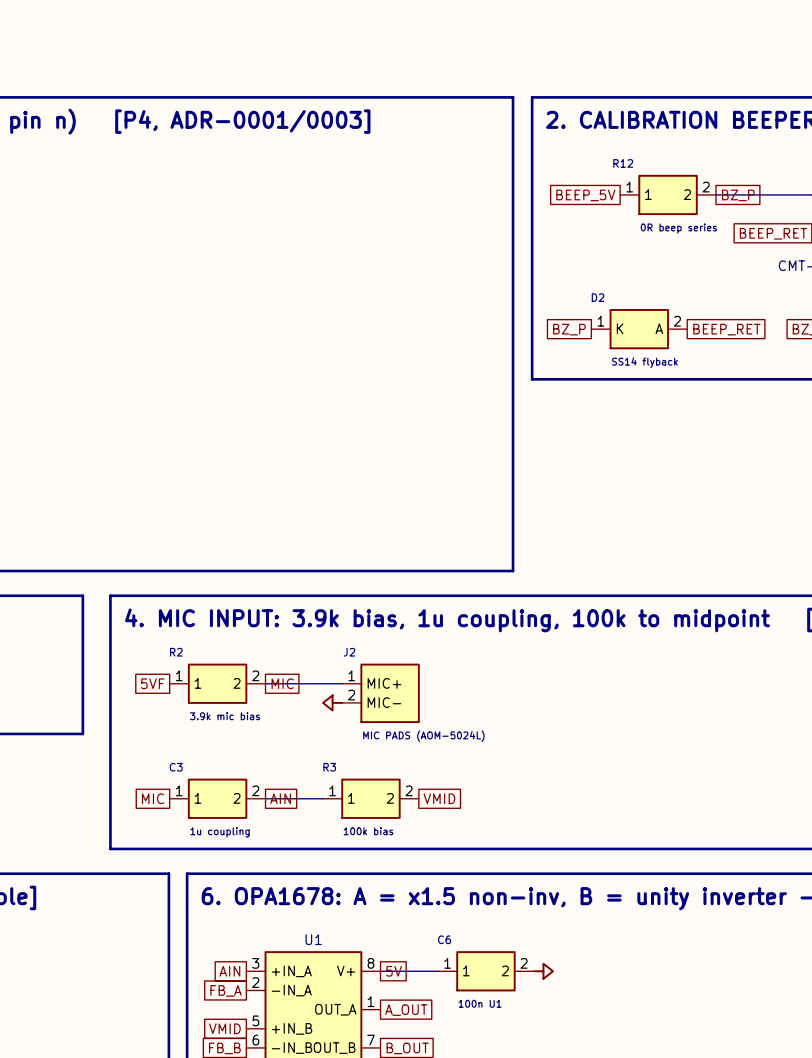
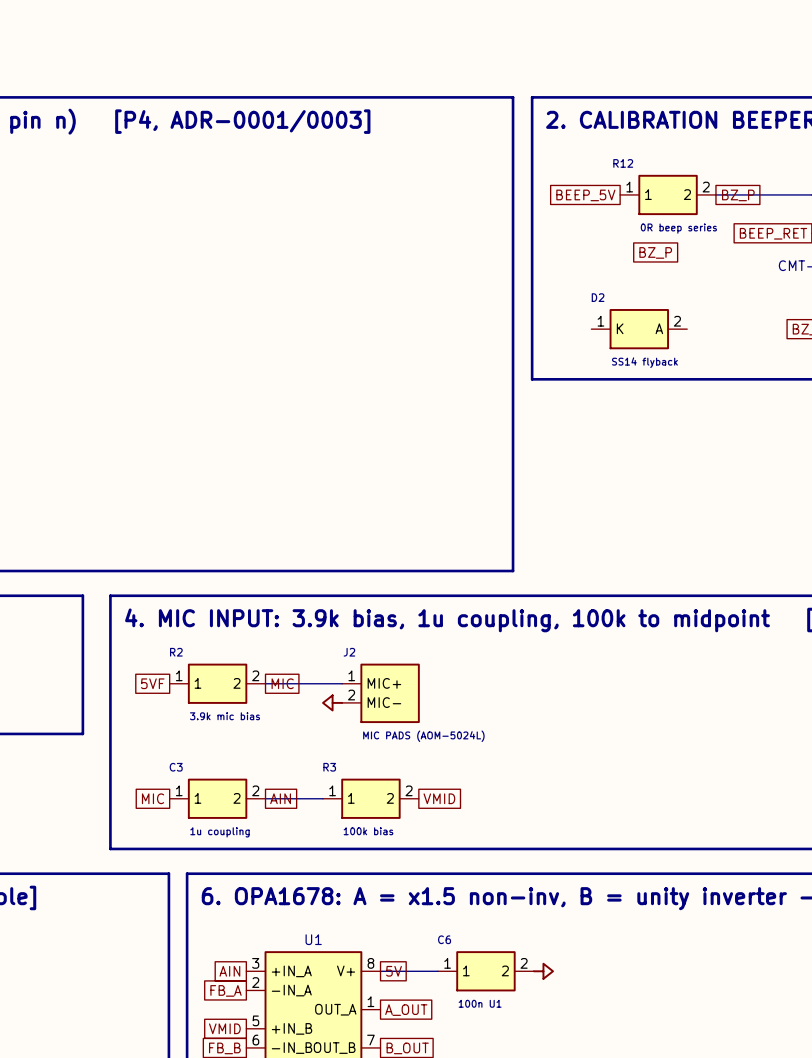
global label position: BZ_P (569, 329) -> BZ_P (655, 252)
global label: BEEP_RET (726, 329) -> none

